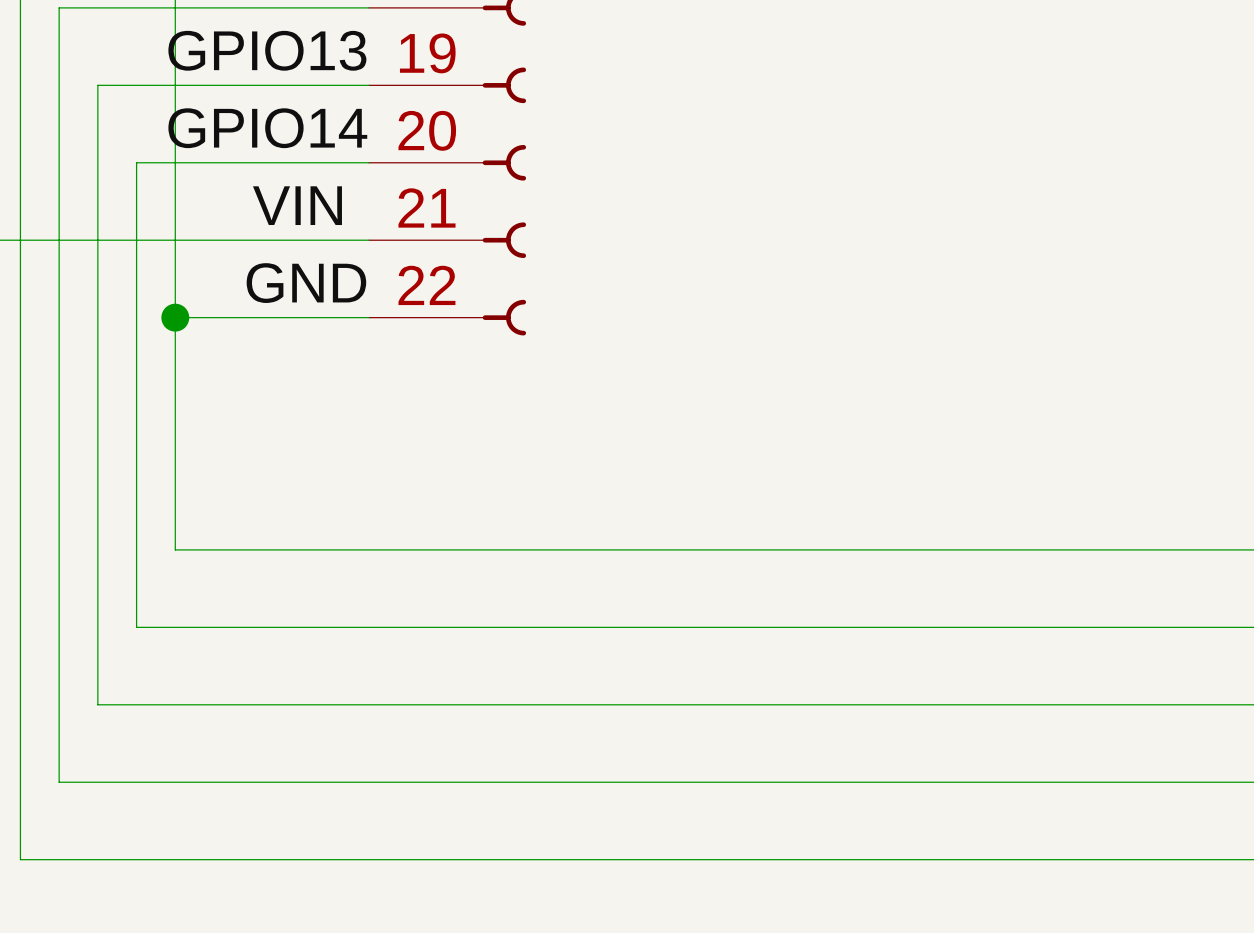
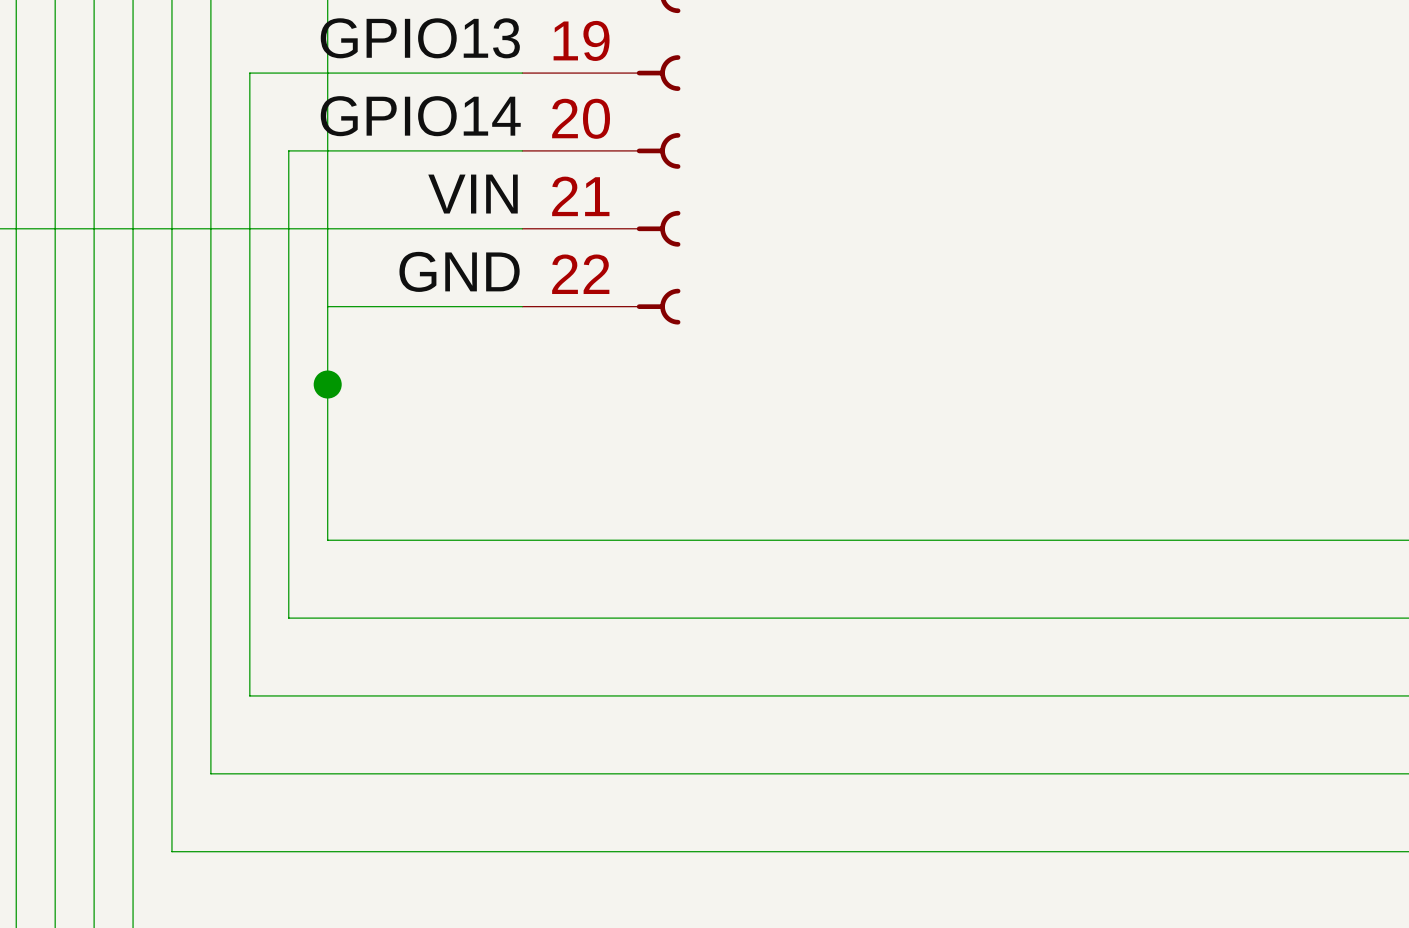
label position: VIN (297, 205) -> VIN (473, 194)
junction position: (175, 317) -> (327, 384)

